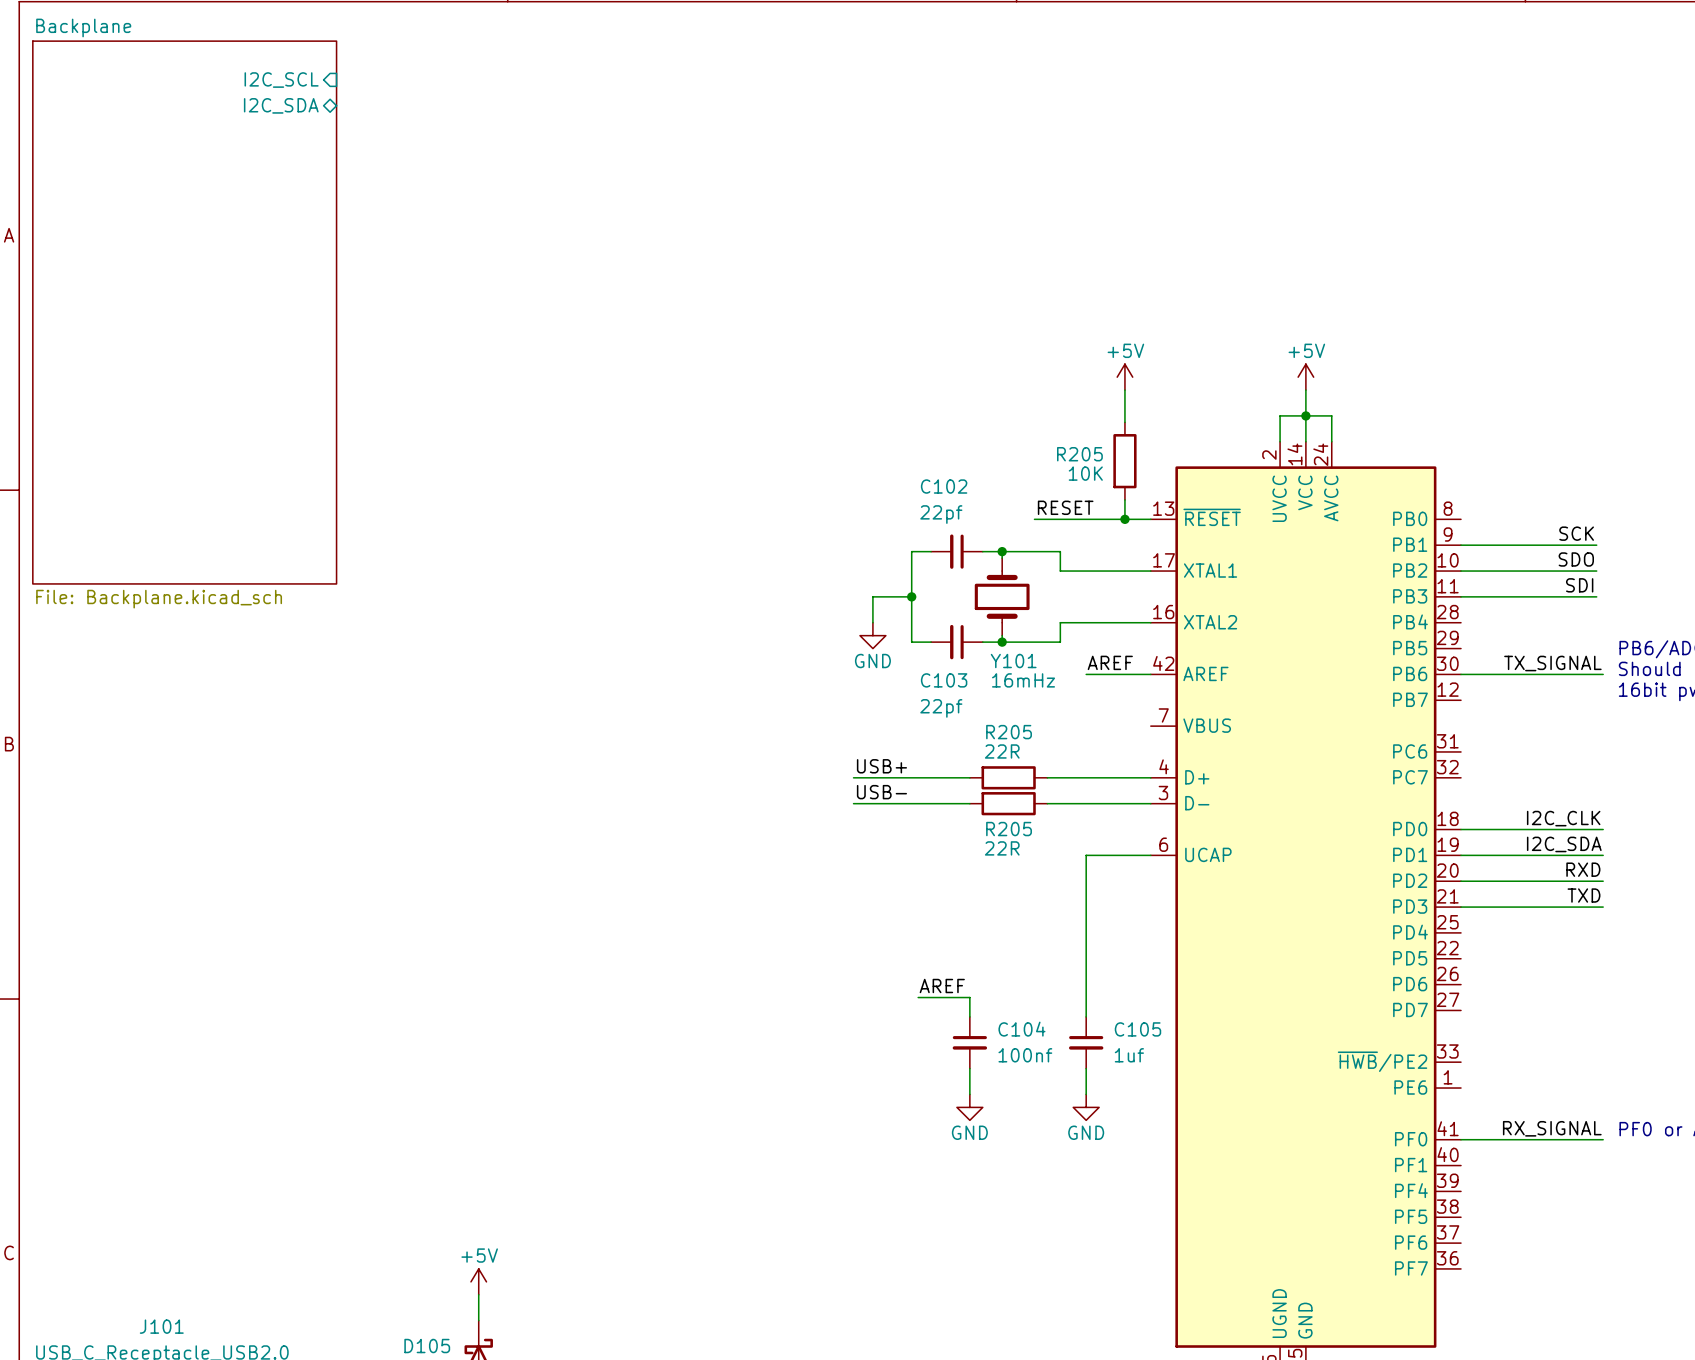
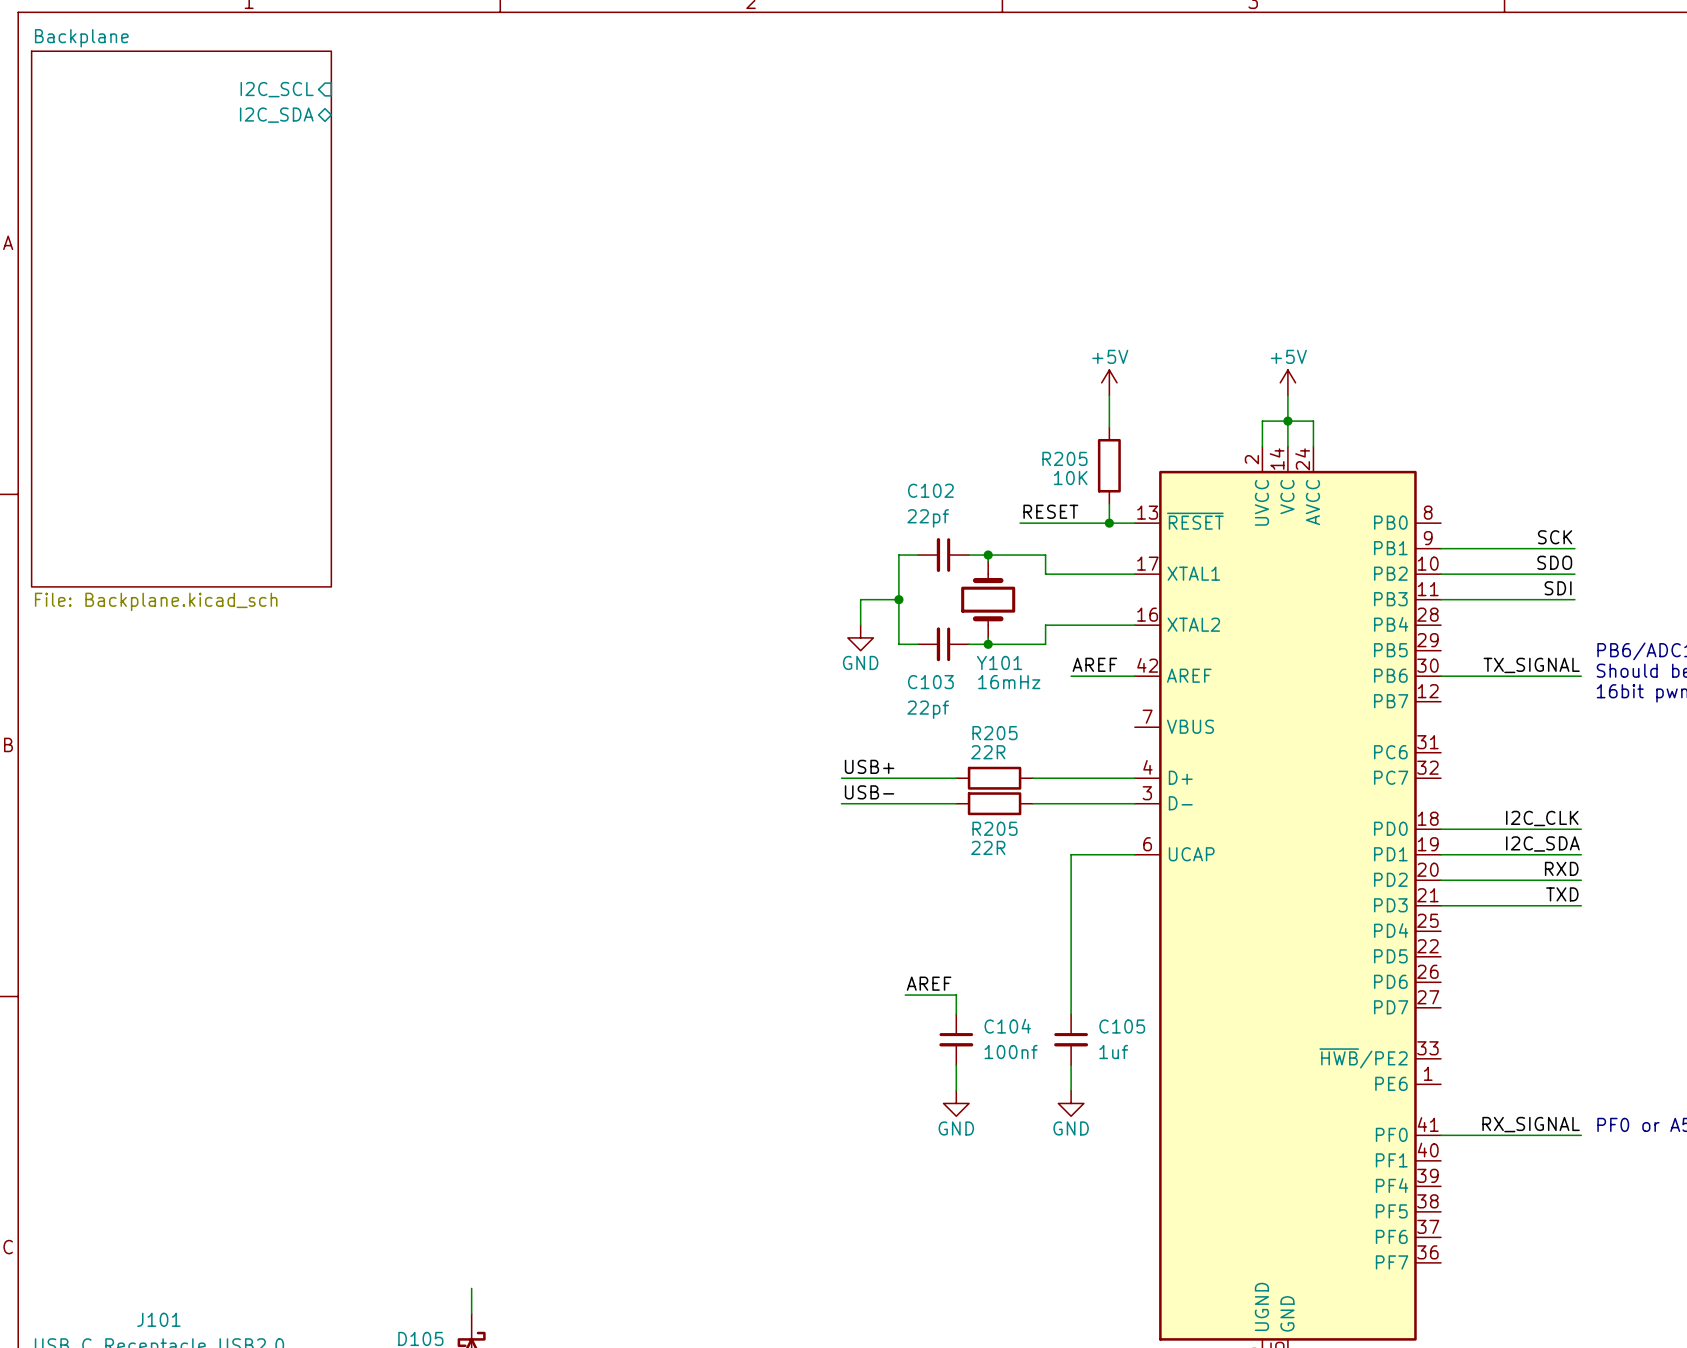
power symbol: +5V (478, 1281) -> none

